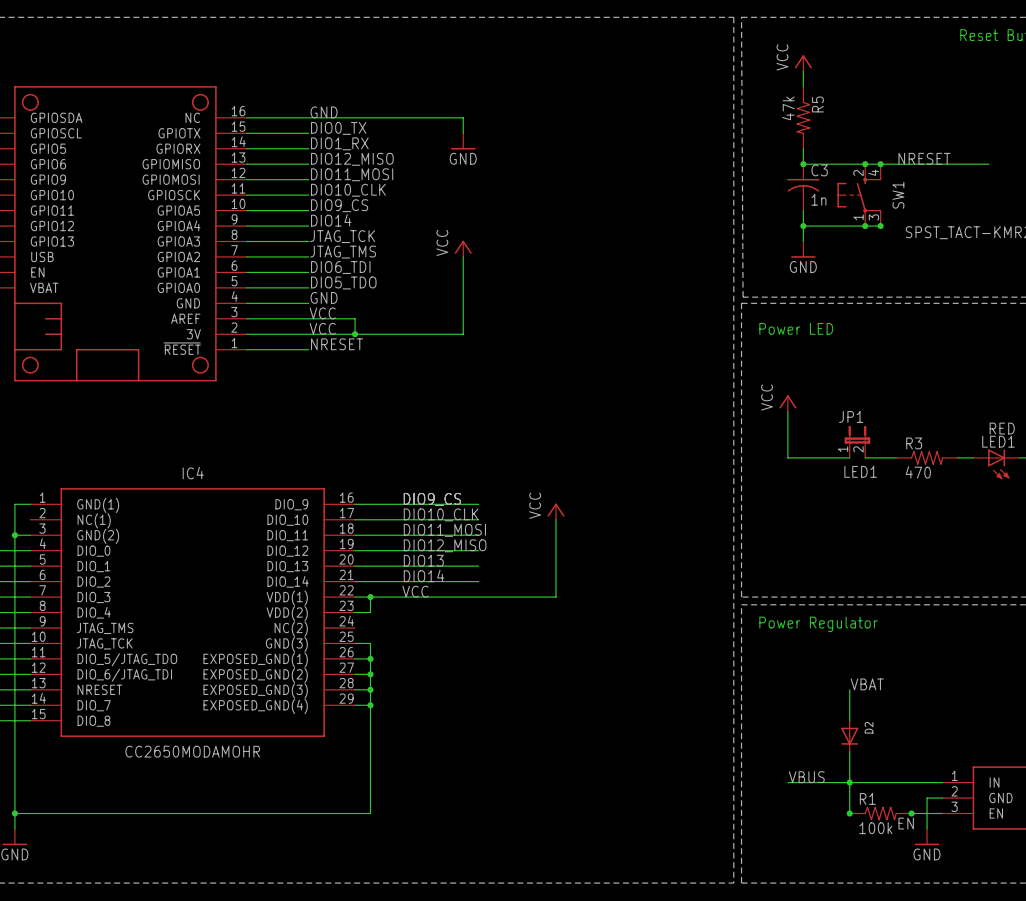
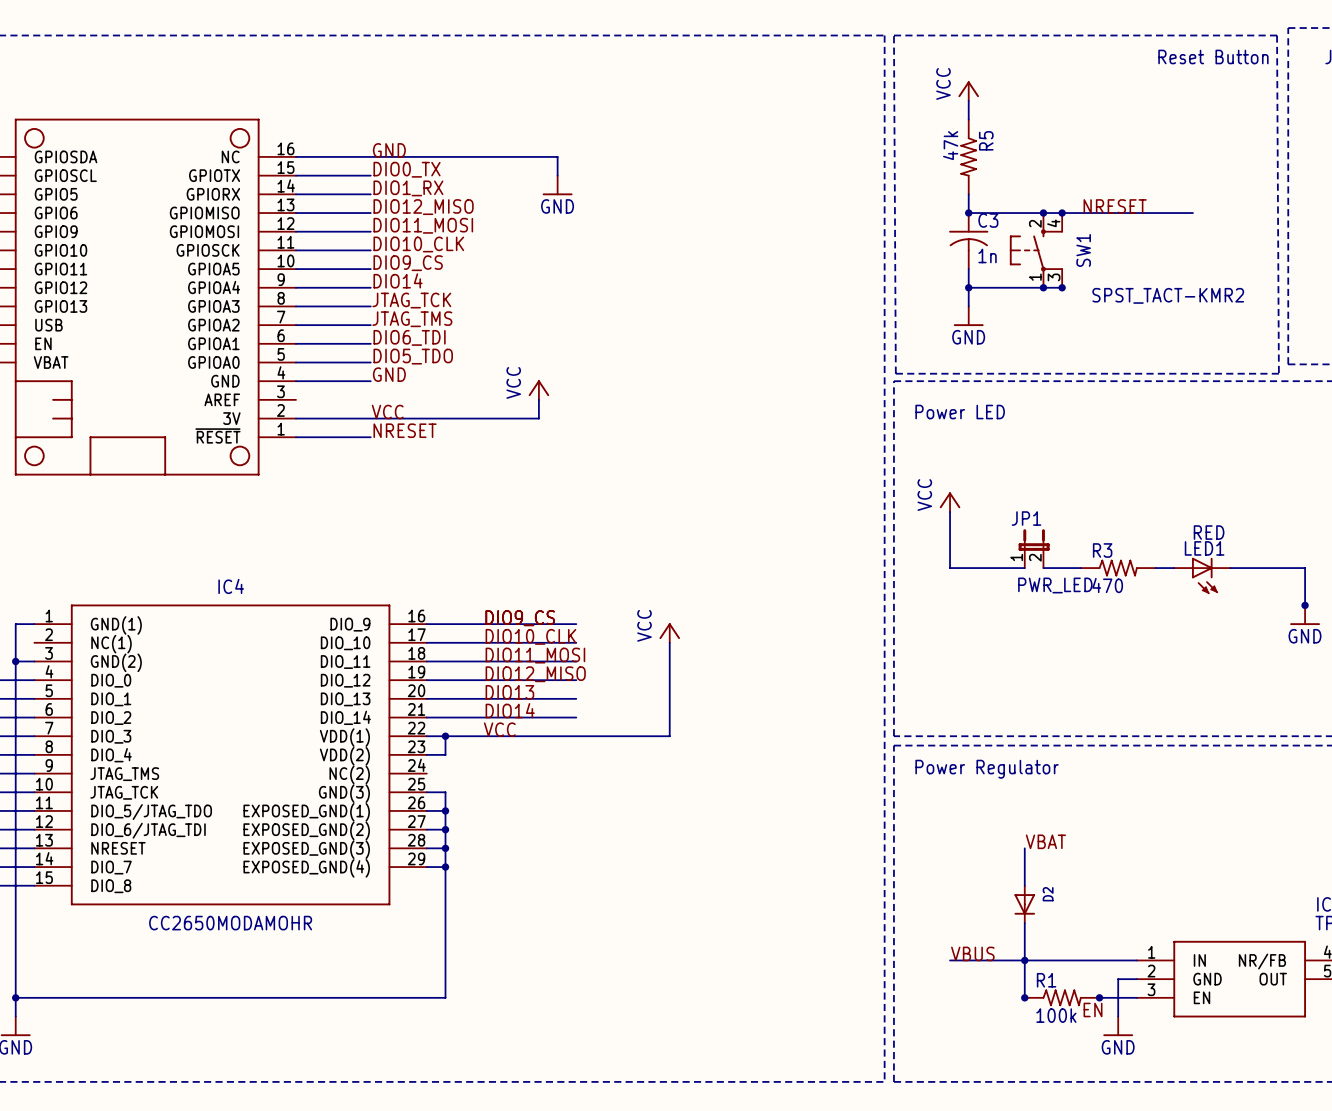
power symbol position: VCC (463, 248) -> VCC (538, 390)
wire: (463, 256) (463, 334) (447, 334) -> (538, 399) (538, 418)
label: VCC (322, 313) -> none
wire: (246, 318) (355, 318) (355, 334) -> none
junction: (355, 334) -> none
JP1 value: LED1 (860, 471) -> PWR_LED (1055, 585)

